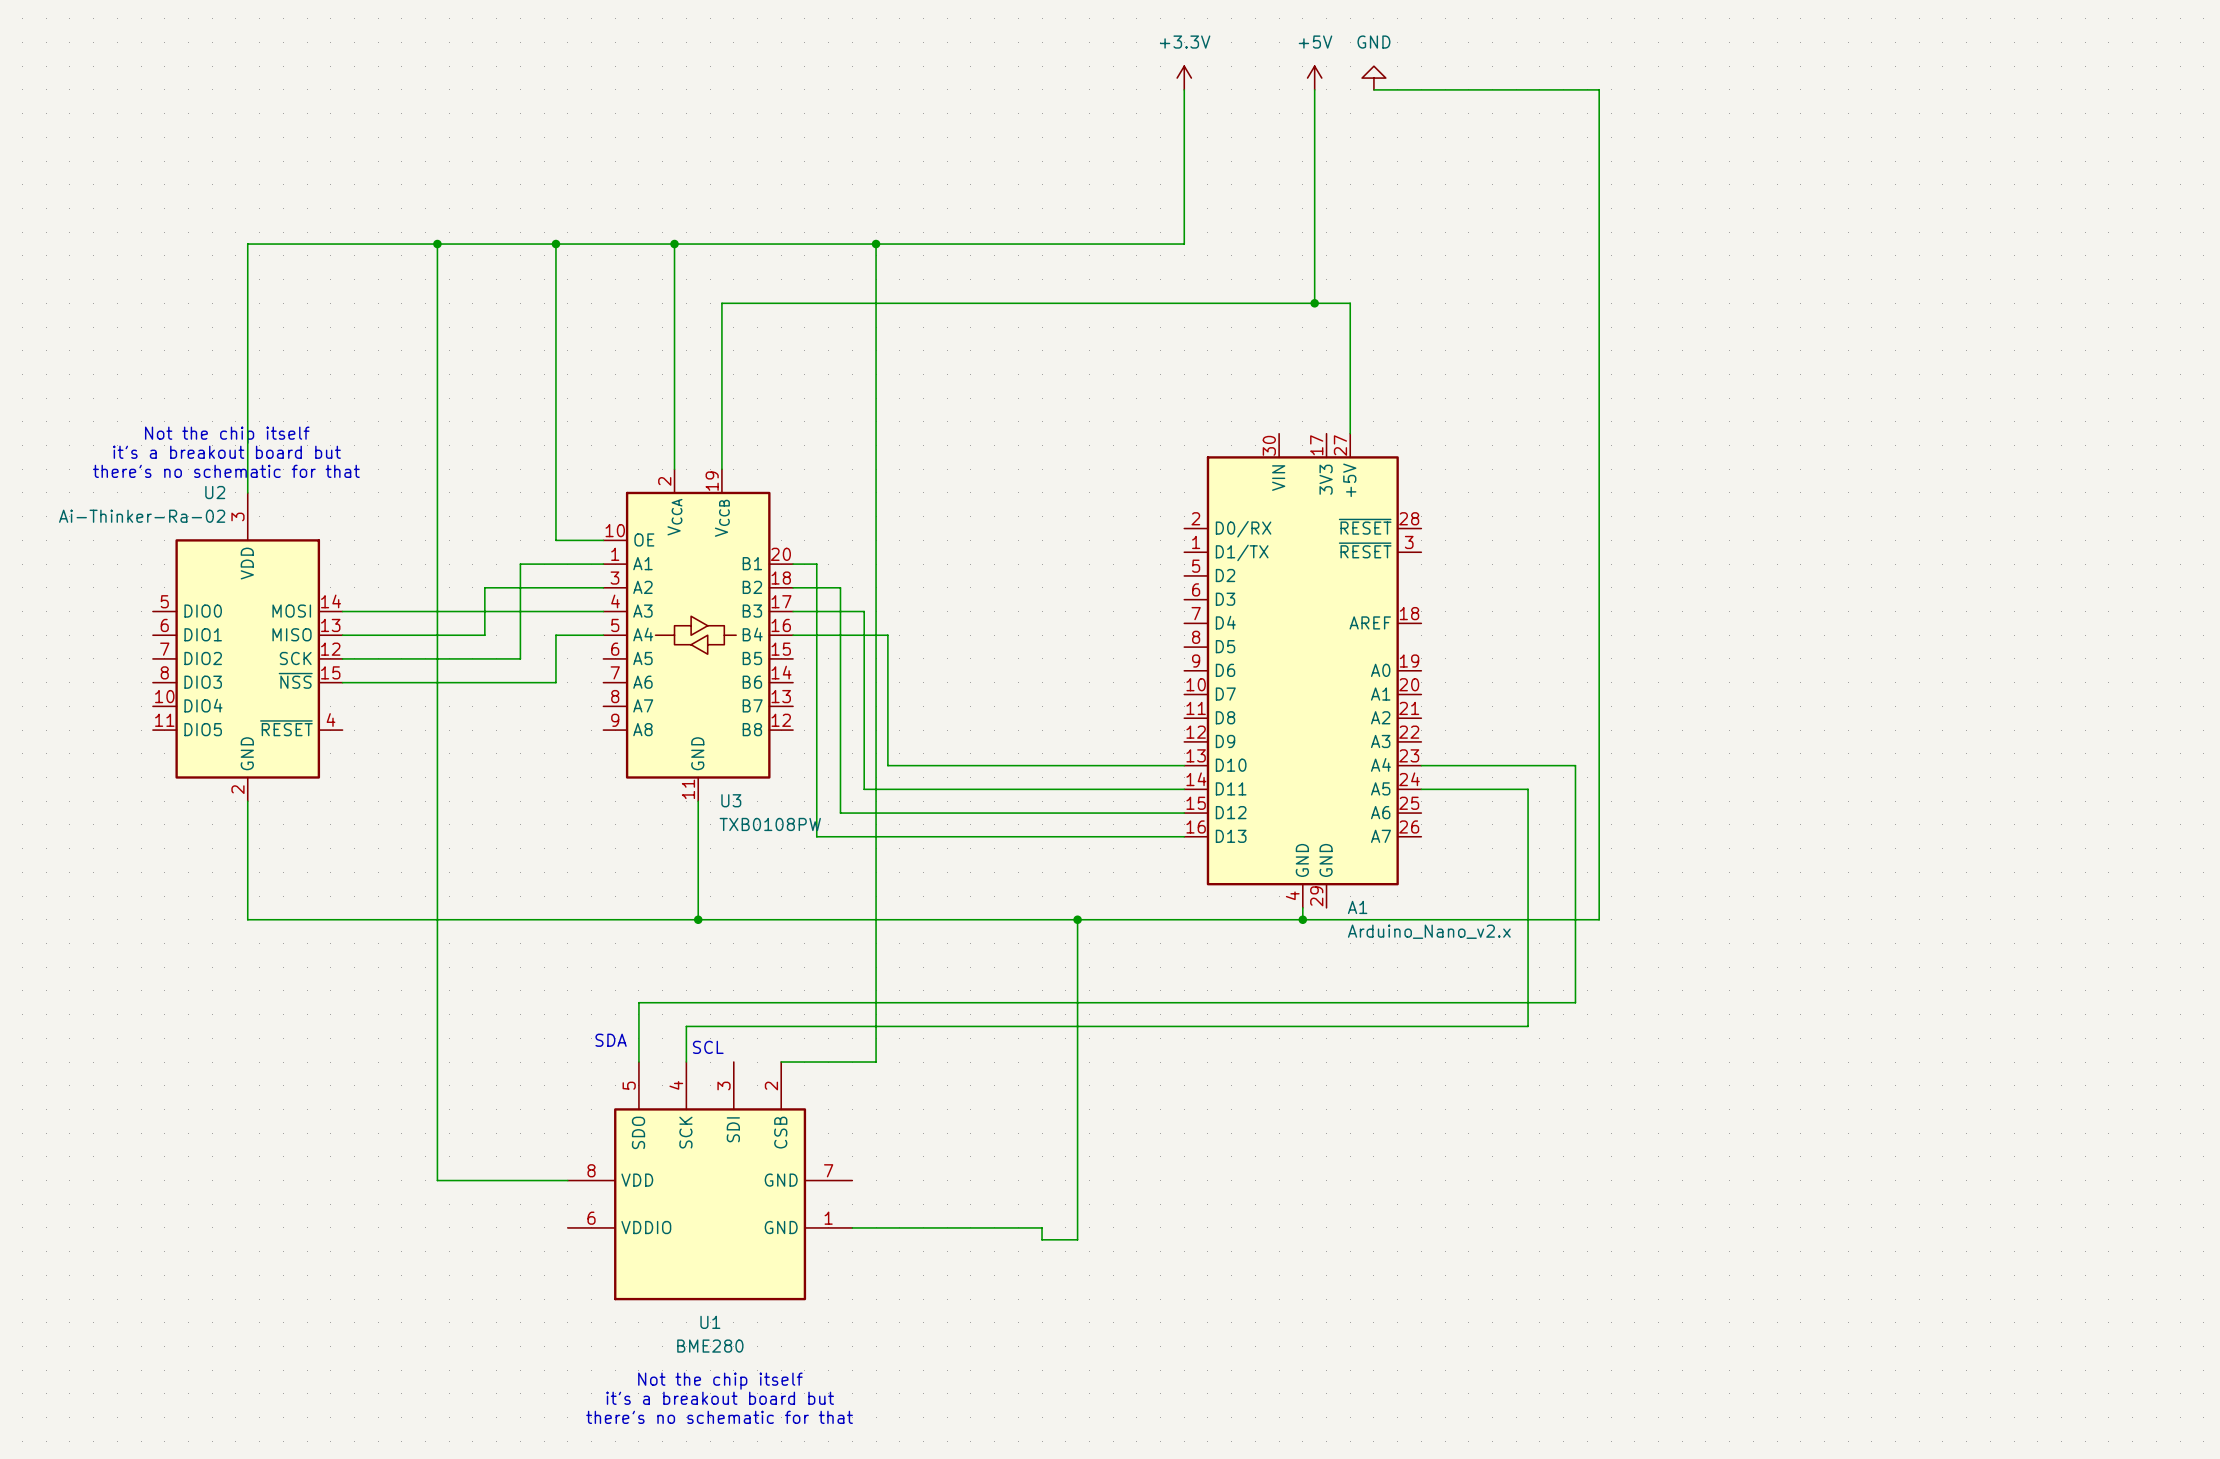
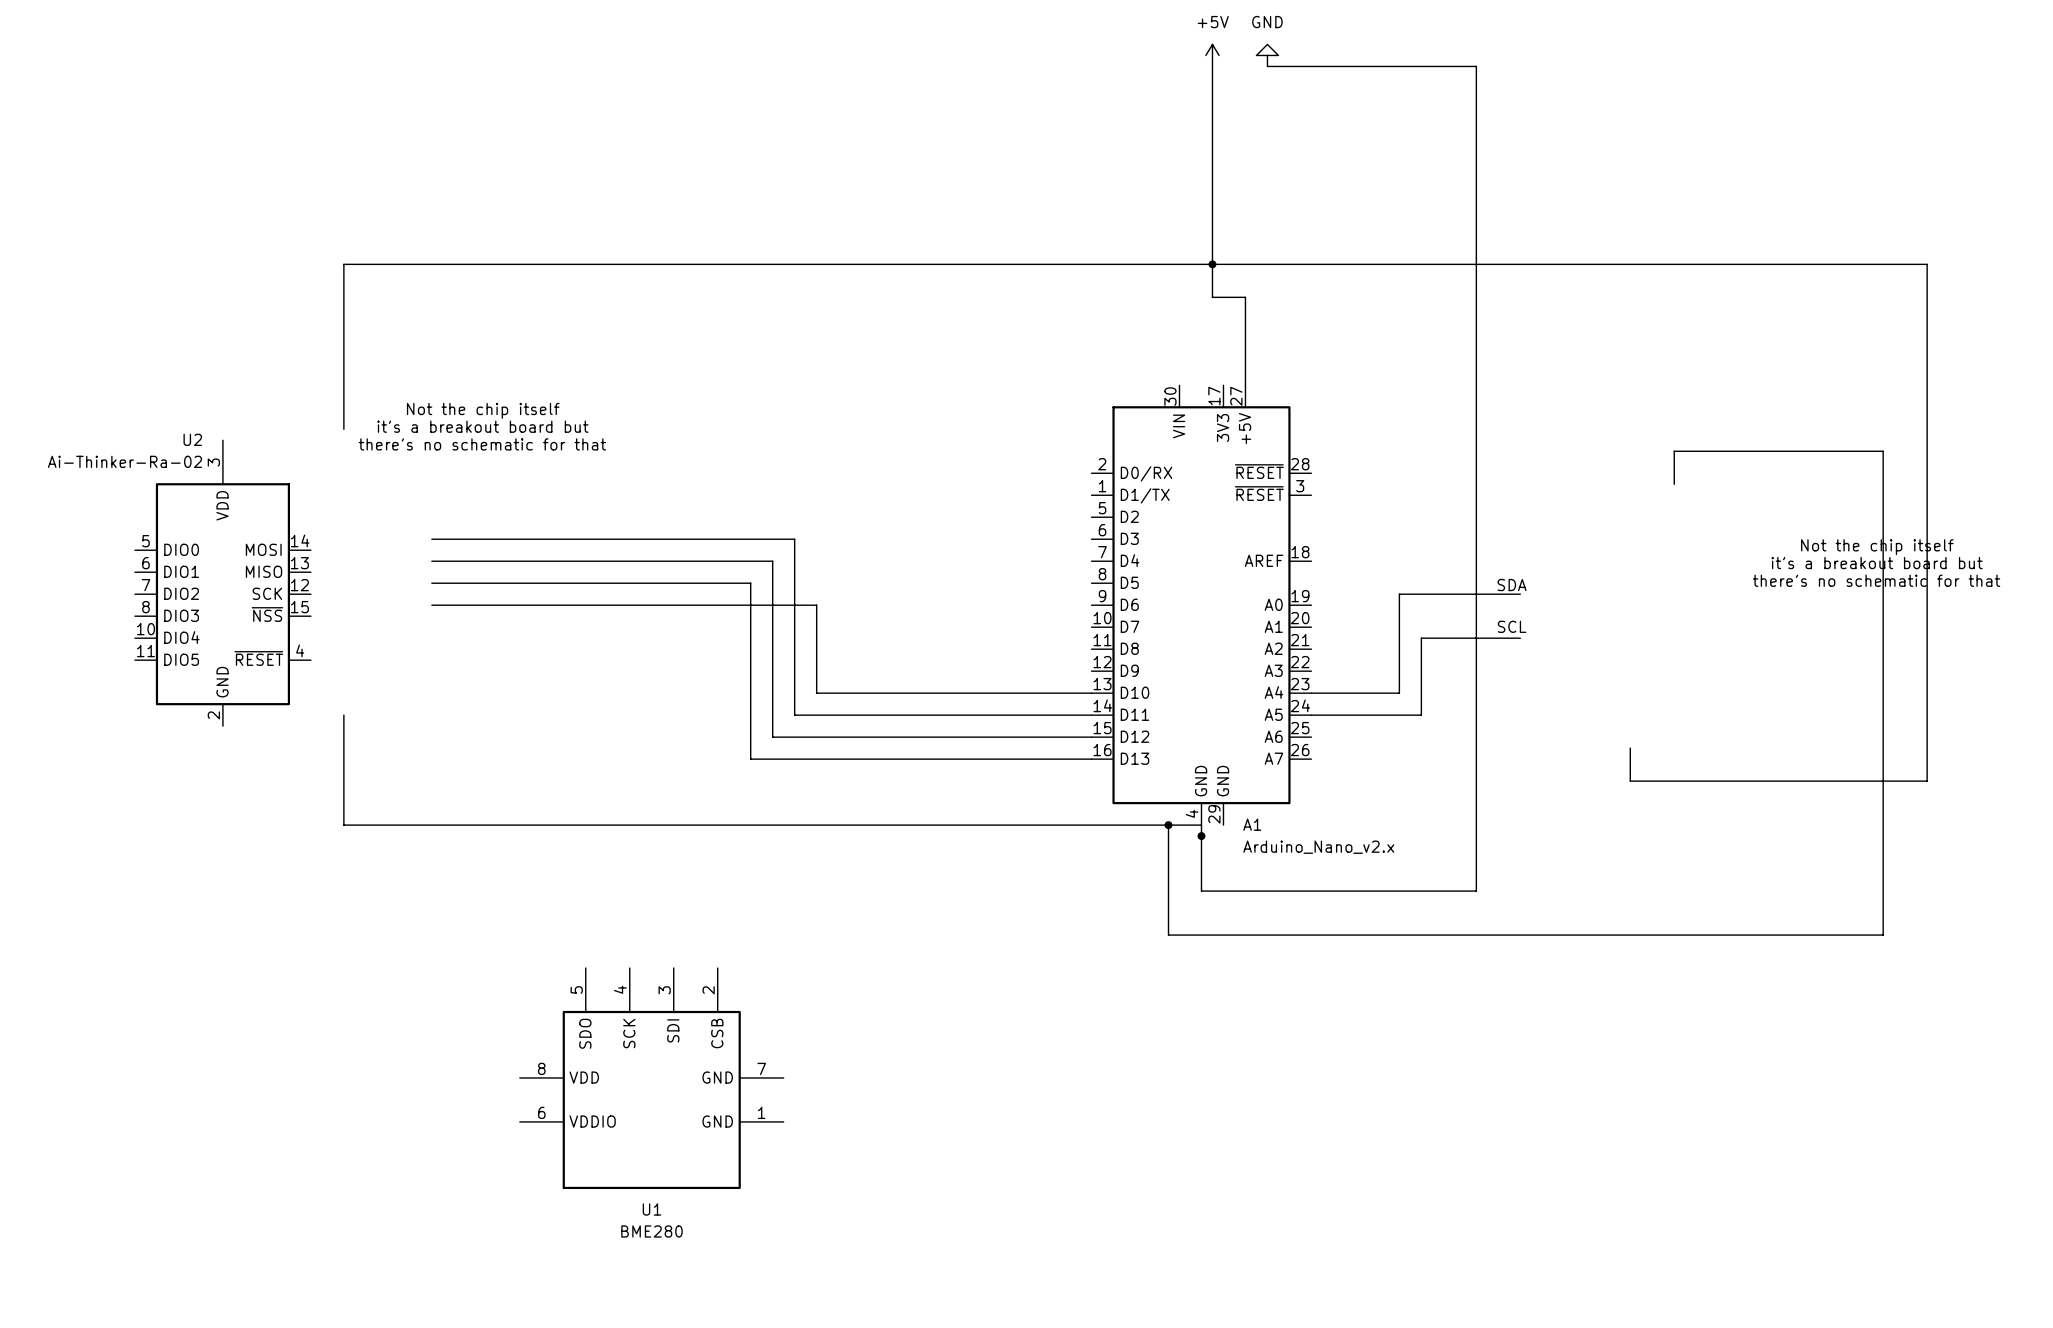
power symbol: +3.3V (1184, 78) -> none
wire: (1184, 89) (1184, 244) (247, 244) (247, 492) -> none
wire: (437, 244) (437, 1180) (567, 1180) -> none
junction: (437, 244) -> none
wire: (555, 244) (555, 540) (603, 540) -> none
junction: (555, 244) -> none
wire: (674, 244) (674, 469) -> none
junction: (674, 244) -> none
wire: (876, 244) (876, 1062) (781, 1062) -> none
junction: (876, 244) -> none
wire: (721, 303) (721, 469) -> (662, 264) (343, 264) (343, 429)
wire: (1350, 303) (1350, 338) -> (1212, 264) (1212, 297) (1245, 297)
wire: none -> (1245, 264) (1927, 264) (1927, 781) (1630, 781) (1630, 748)
text: Not the chip itself (227, 435) -> none
text: it's a breakout board but (226, 452) -> none
text: none -> Not the chip itself (483, 410)
text: there's no schematic for that (226, 471) -> none
text: none -> it's a breakout board but (482, 426)
text: none -> there's no schematic for that (482, 444)
wire: none -> (1674, 484) (1674, 451) (1883, 451) (1883, 935) (1410, 935)
wire: (603, 564) (520, 564) (520, 658) (342, 658) -> none
wire: (793, 564) (816, 564) (816, 647) -> (431, 583) (750, 583)
wire: (603, 587) (484, 587) (484, 635) (342, 635) -> none
wire: (793, 587) (840, 587) (840, 623) -> (431, 561) (772, 561)
text: none -> Not the chip itself (1877, 547)
wire: (342, 611) (603, 611) -> none
wire: (793, 611) (864, 611) -> (431, 539) (794, 539) (794, 550)
text: none -> it's a breakout board but (1877, 563)
wire: (603, 635) (555, 635) (555, 682) (342, 682) -> none
U3: TXB0108PW (698, 635) -> none
wire: (793, 635) (887, 635) (887, 670) -> (431, 605) (816, 605)
text: none -> there's no schematic for that (1876, 580)
text: none -> SDA (1512, 585)
text: none -> SCL (1512, 626)
wire: (1516, 765) (1575, 765) (1575, 1002) (638, 1002) (638, 1062) -> (1399, 693) (1399, 594) (1520, 594)
wire: none -> (343, 715) (343, 825) (1201, 825)
wire: (1528, 789) (1528, 1026) -> (1410, 715) (1421, 715) (1421, 638) (1520, 638)
wire: (247, 801) (247, 919) (1599, 919) -> (1201, 836) (1201, 891) (1476, 891) (1476, 836)
wire: (698, 801) (698, 919) -> none
junction: none -> (1168, 825)
junction: (698, 919) -> none
wire: (1077, 919) (1077, 1239) (1042, 1239) (1042, 1227) (852, 1227) -> none
junction: (1077, 919) -> none
wire: (1267, 1026) (686, 1026) (686, 1062) -> (1168, 935) (1168, 825)
text: SDA (611, 1040) -> none
text: SCL (708, 1047) -> none
text: Not the chip itself (720, 1381) -> none
text: it's a breakout board but (720, 1398) -> none
text: there's no schematic for that (719, 1417) -> none

